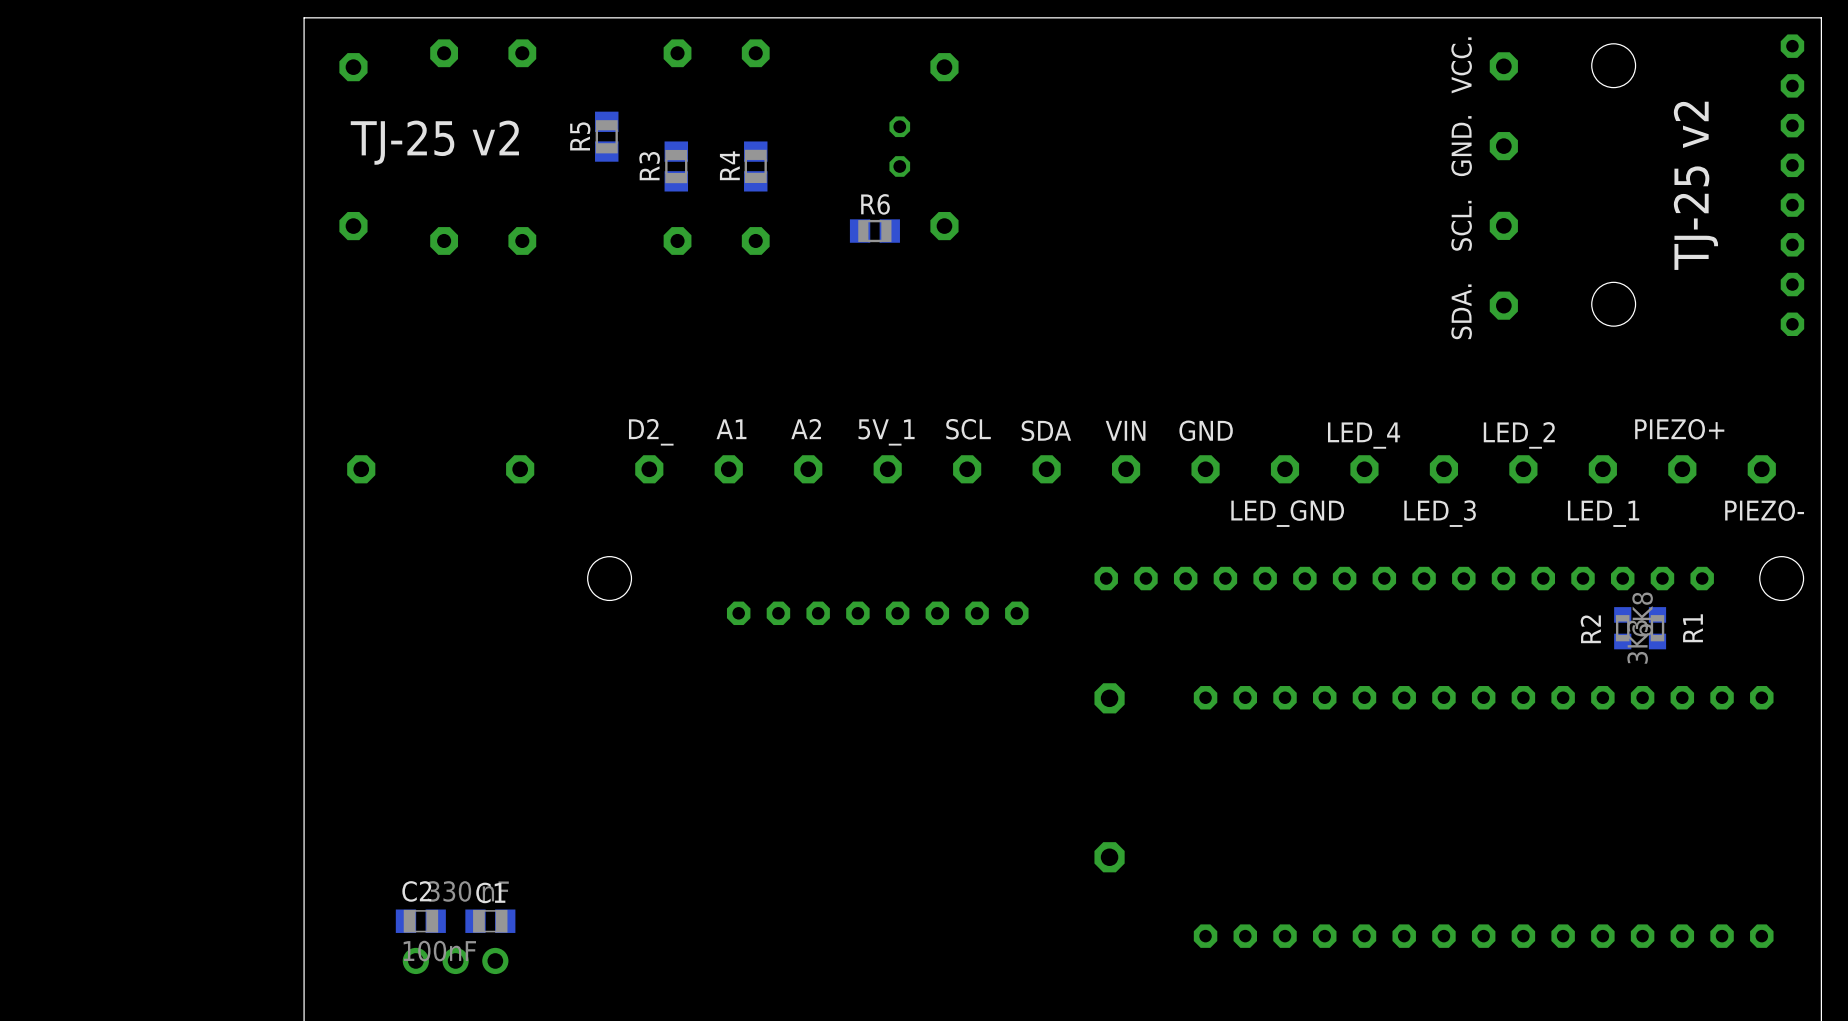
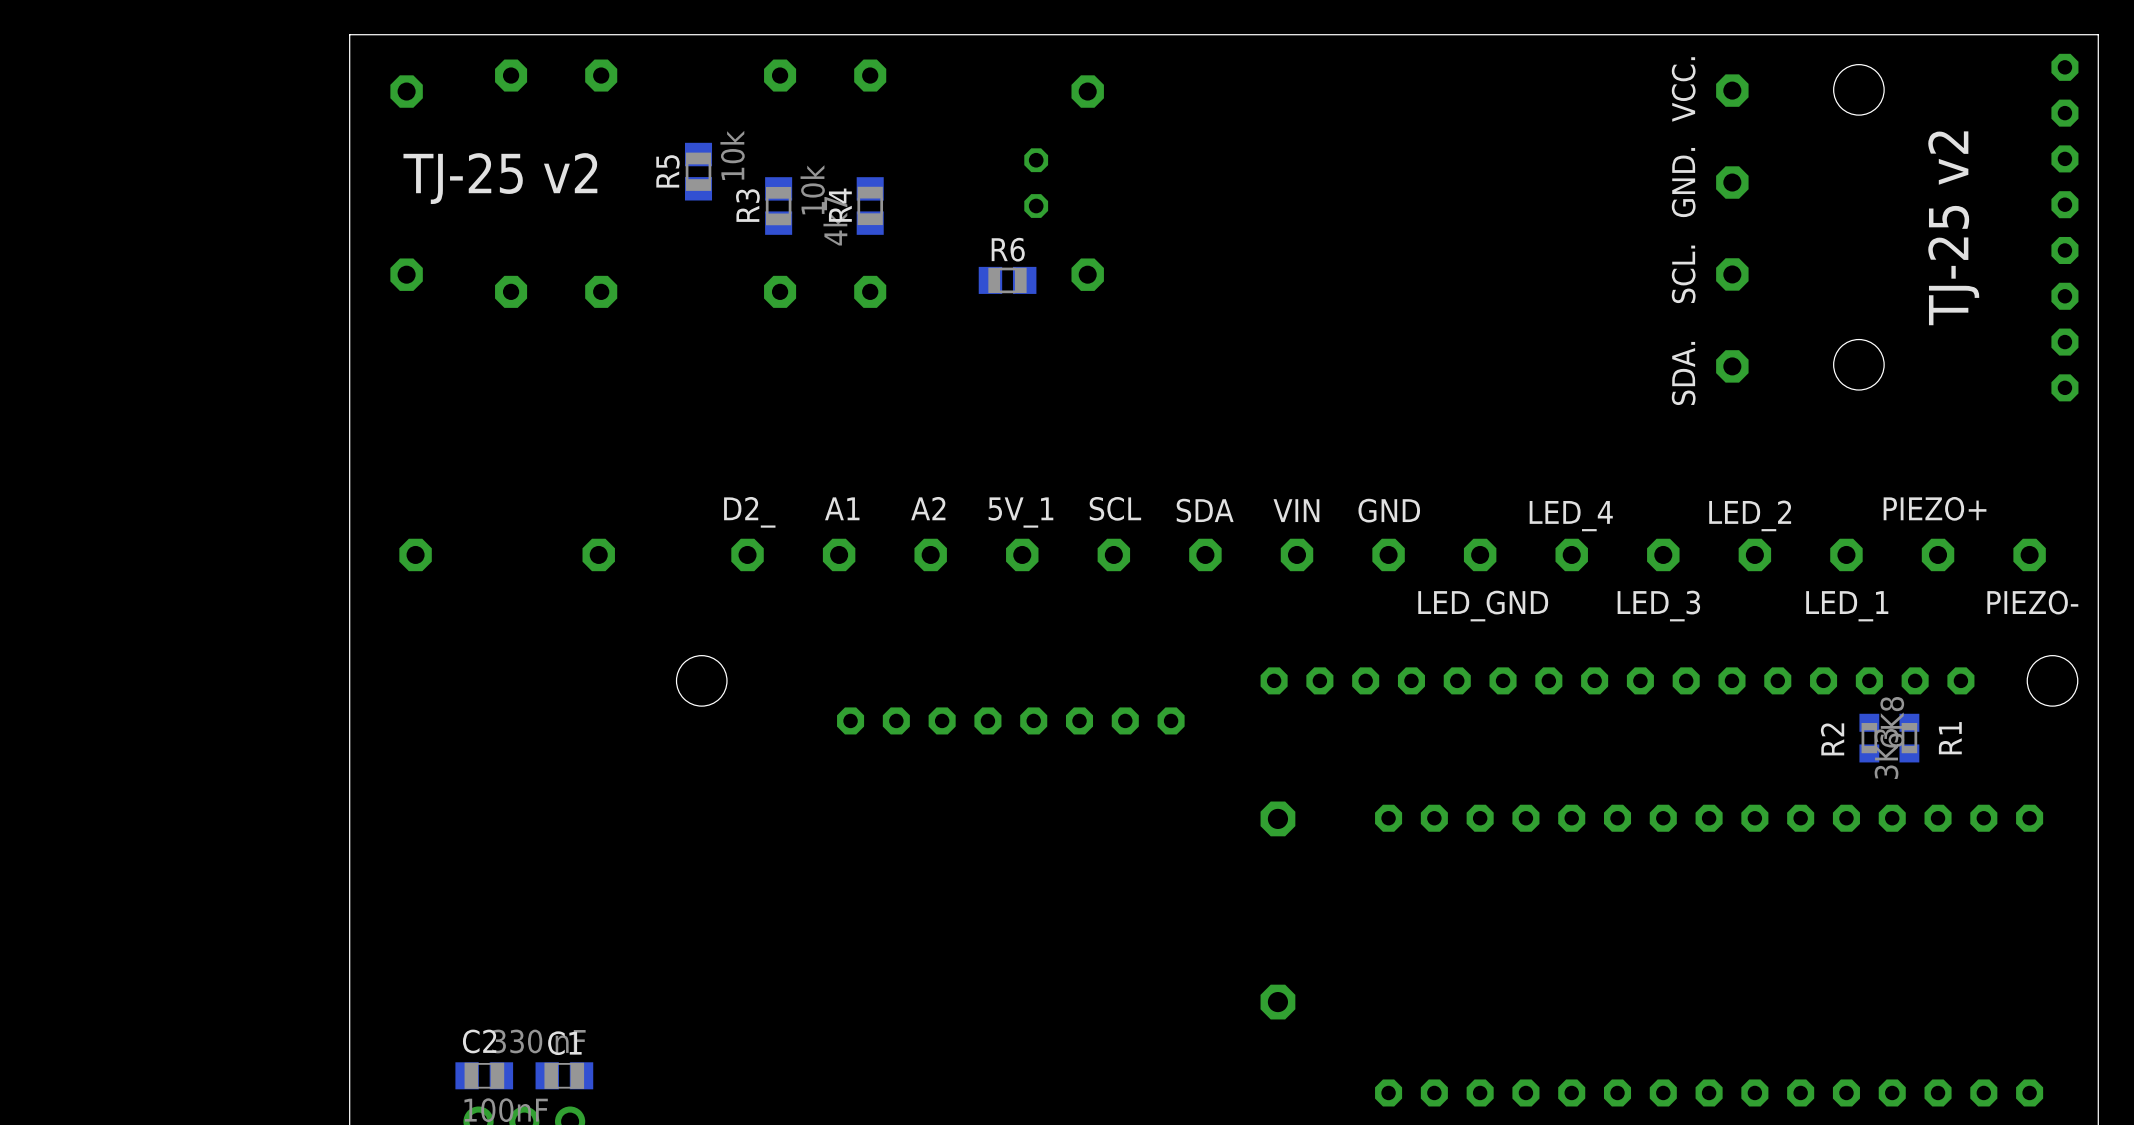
R5 value: none -> 10k (732, 155)
R3 value: none -> 10k (812, 189)
R4 value: none -> 4k7 (835, 221)

